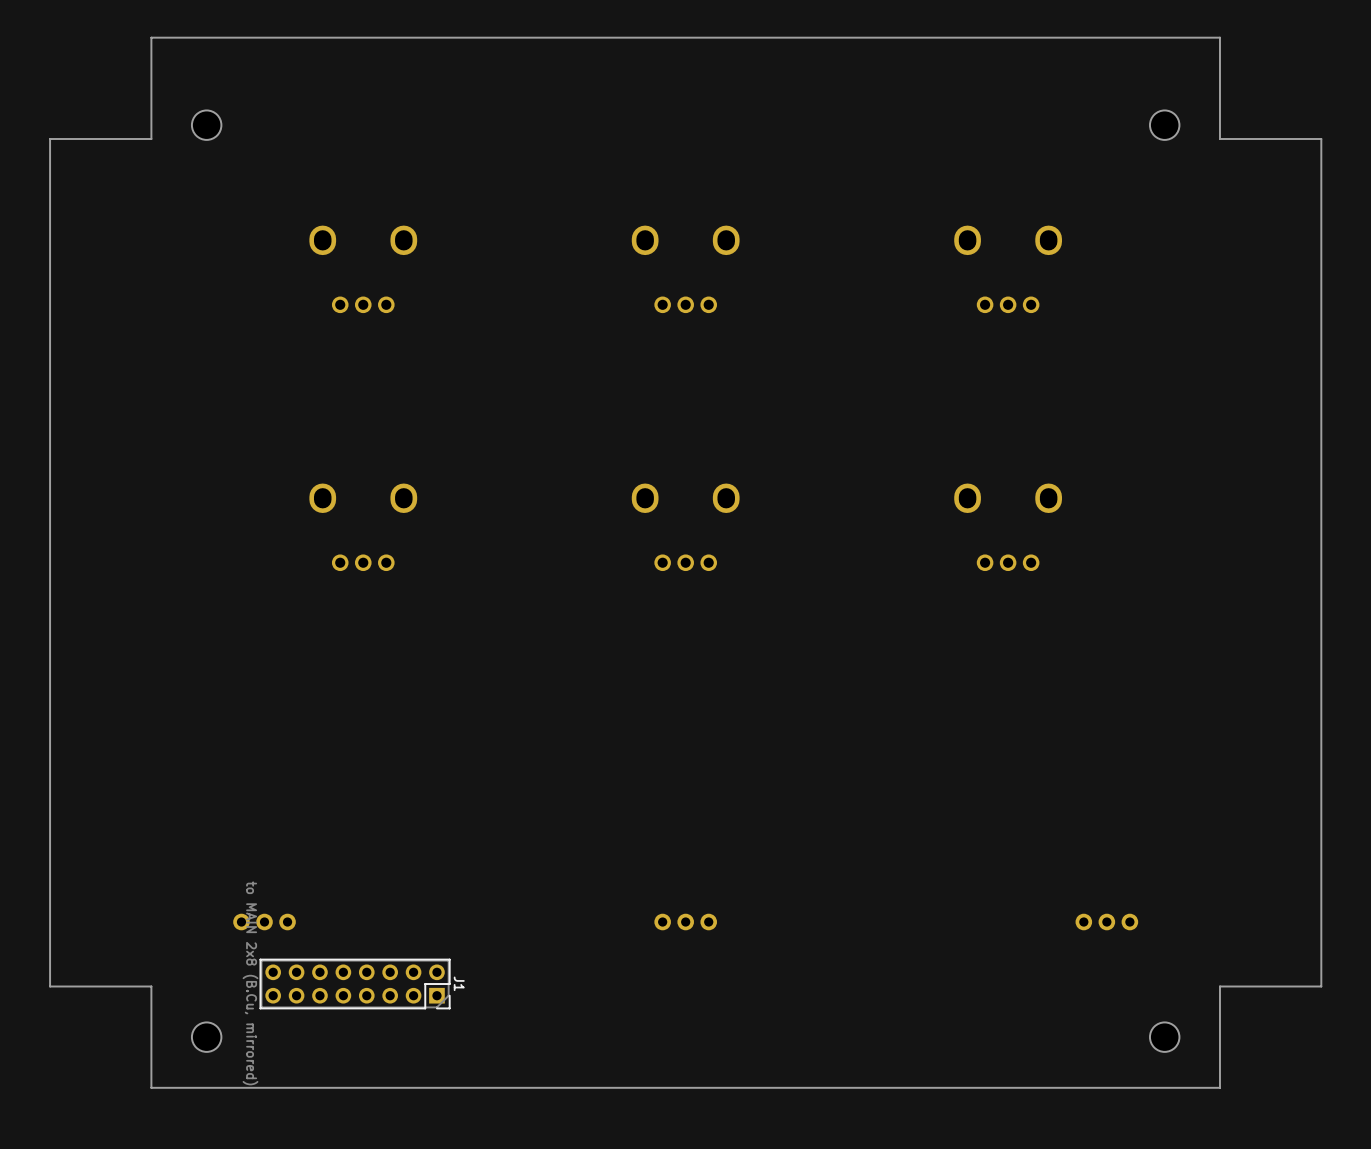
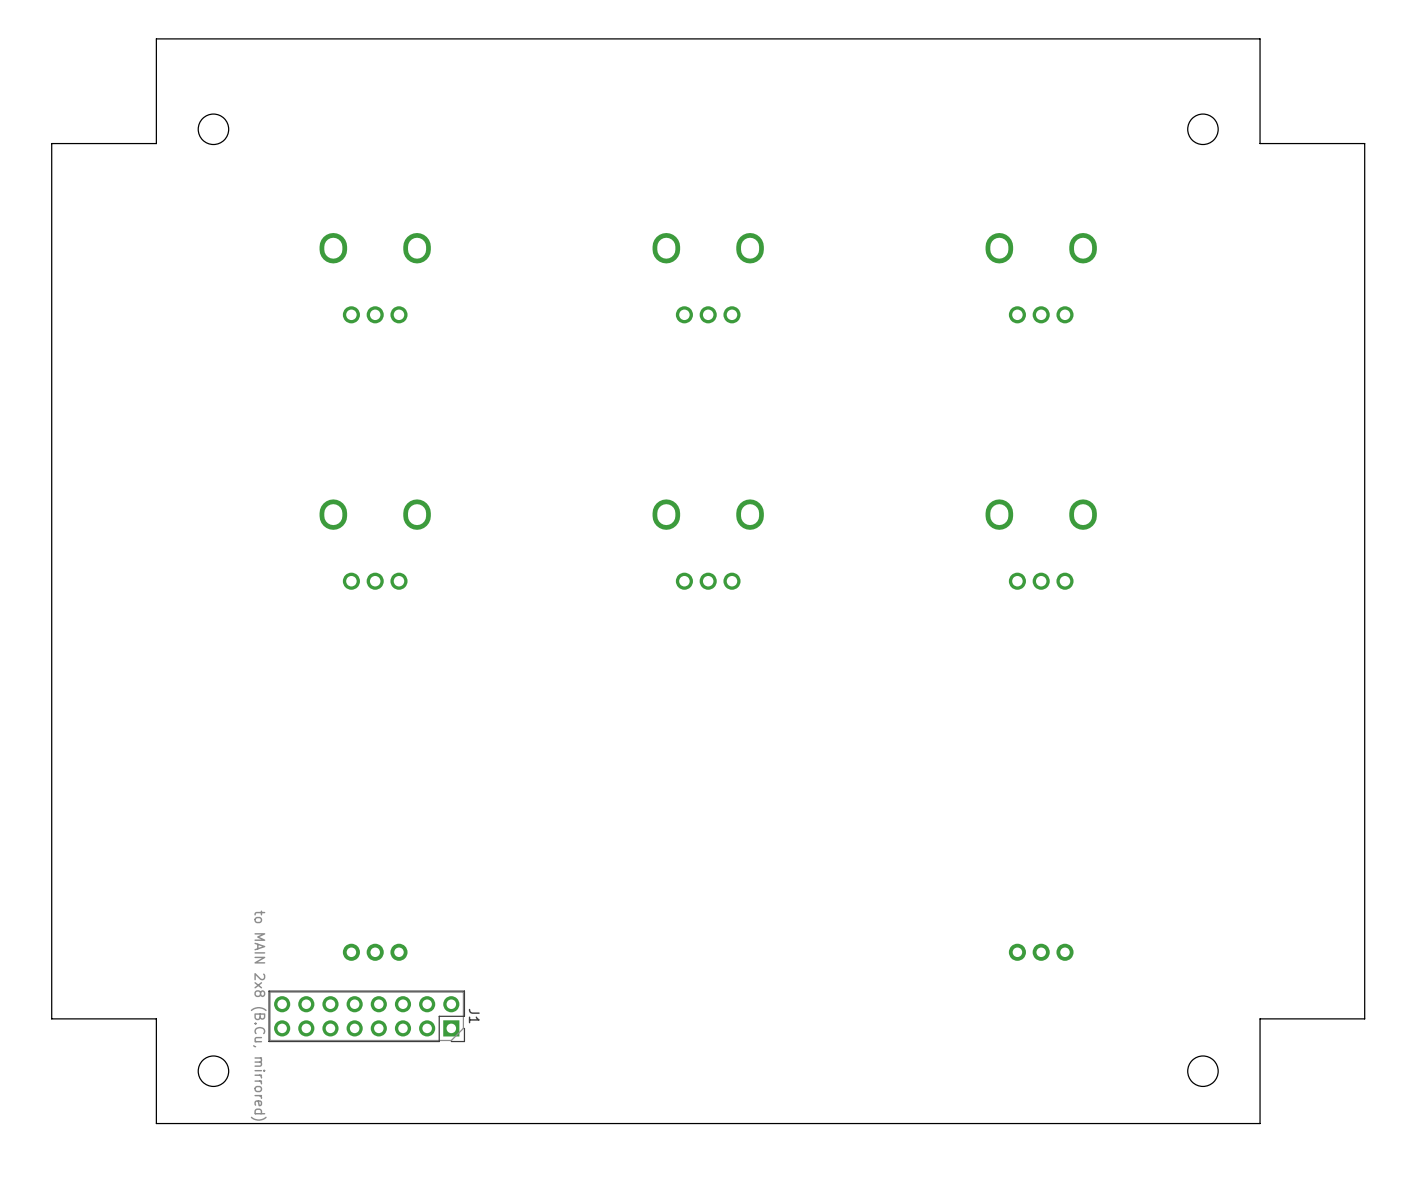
part position: (264, 922) -> (375, 952)
part: (685, 922) -> none
part position: (1106, 922) -> (1041, 952)

